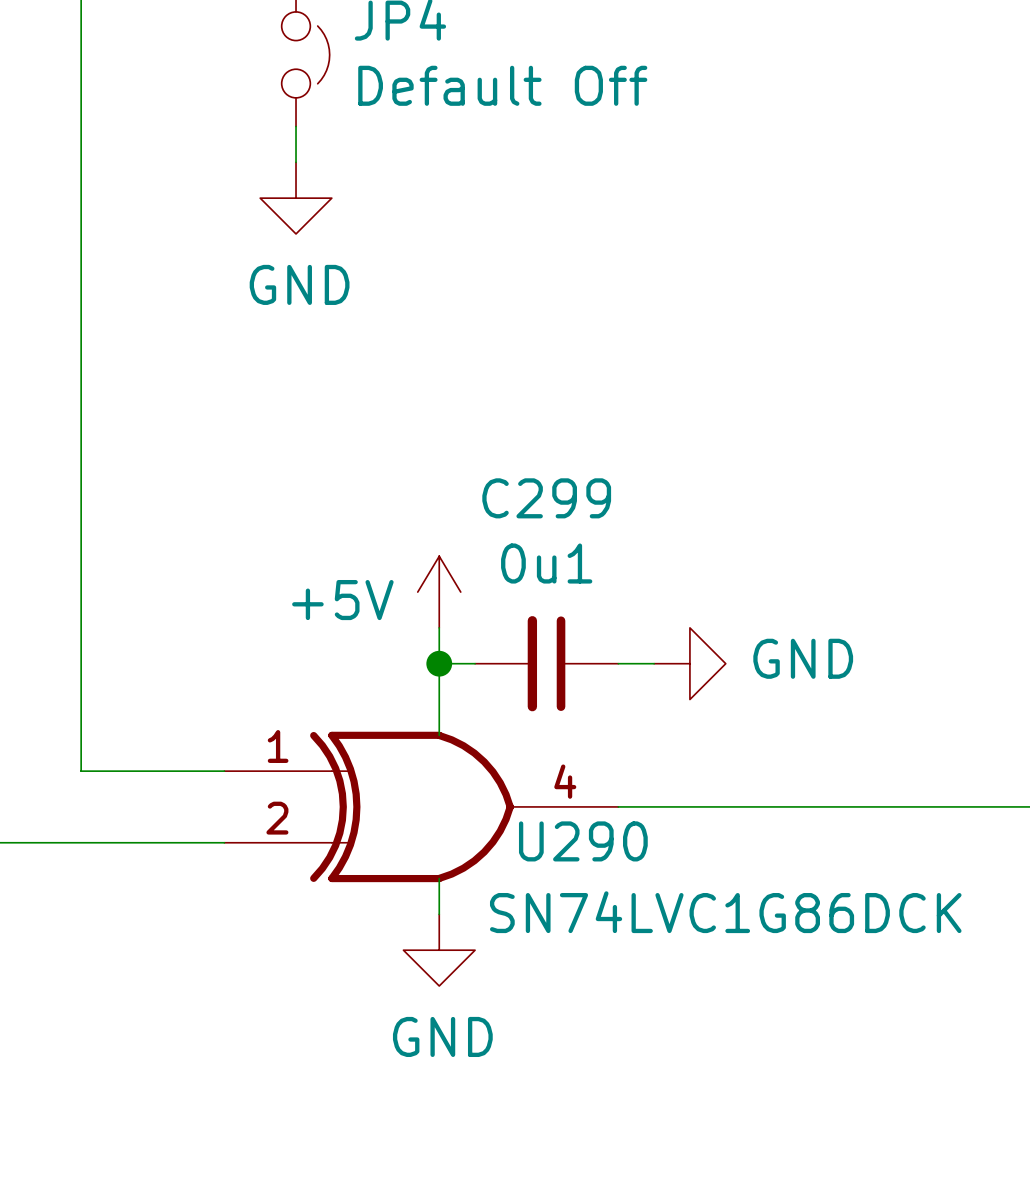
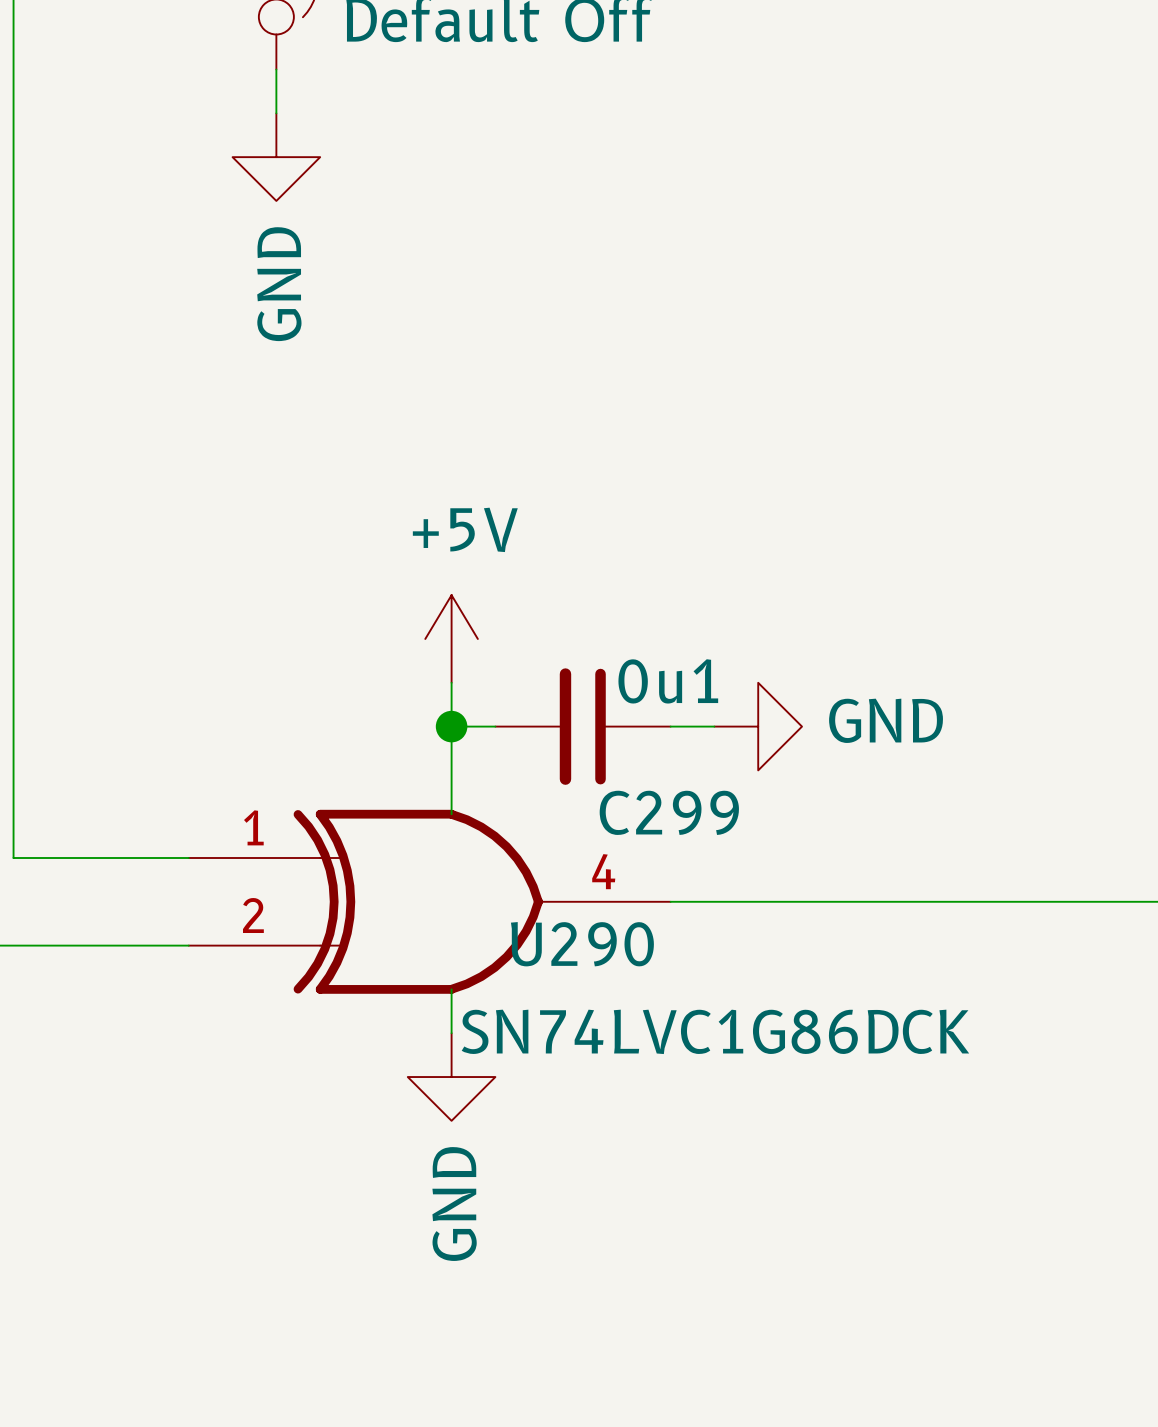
power symbol text rotation: 0° (299, 284) -> 90° counterclockwise (279, 284)
C299 name position: C299 (546, 498) -> C299 (669, 812)
C299 value position: 0u1 (546, 563) -> 0u1 (668, 681)
power symbol text position: +5V (342, 600) -> +5V (465, 529)
U290 name position: U290 (583, 841) -> U290 (582, 944)
U290 value position: SN74LVC1G86DCK (725, 912) -> SN74LVC1G86DCK (715, 1031)
power symbol text rotation: 0° (442, 1036) -> 90° counterclockwise (454, 1204)

